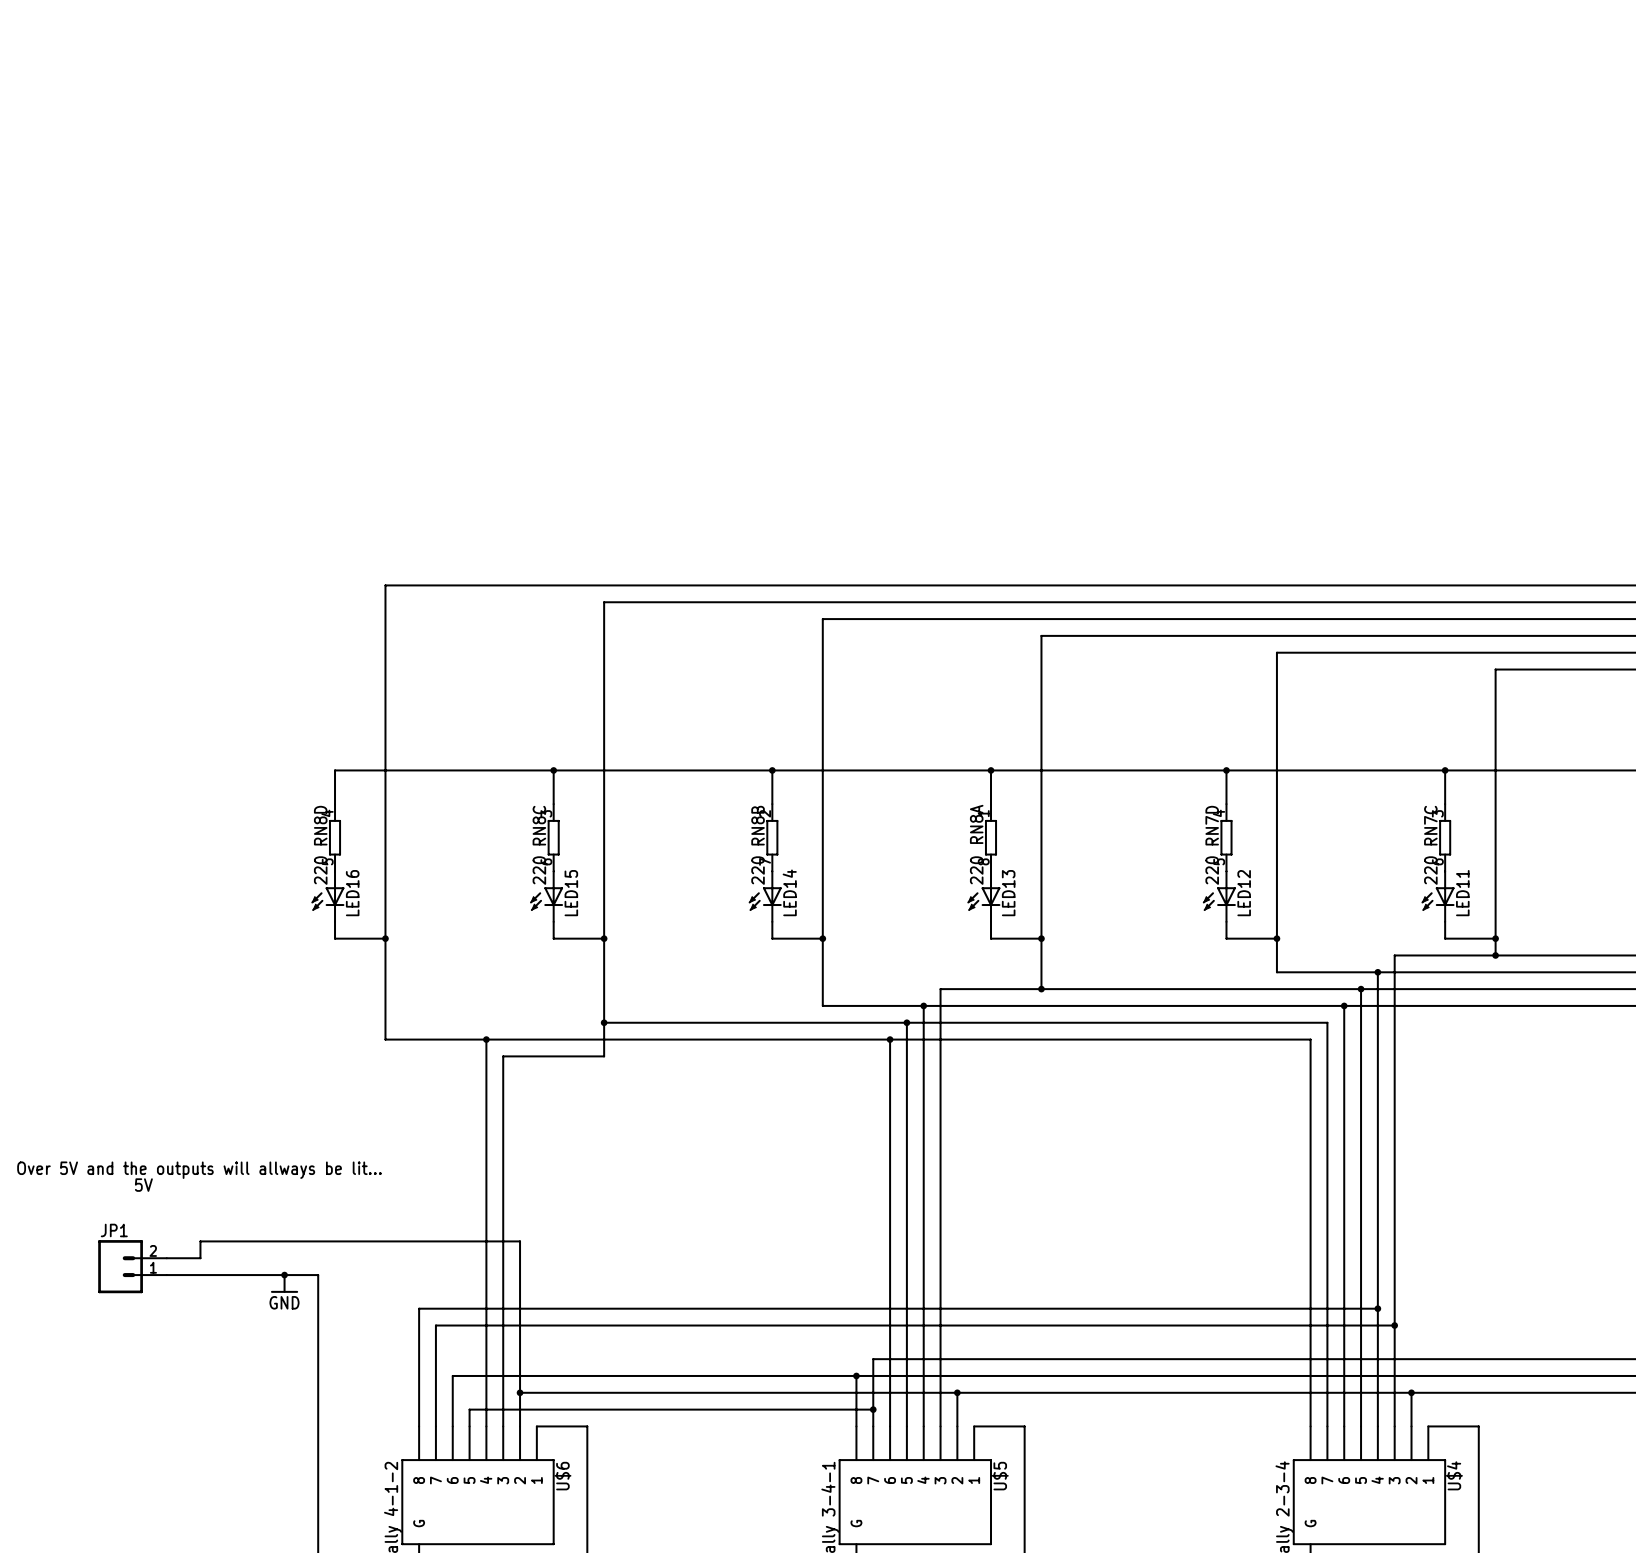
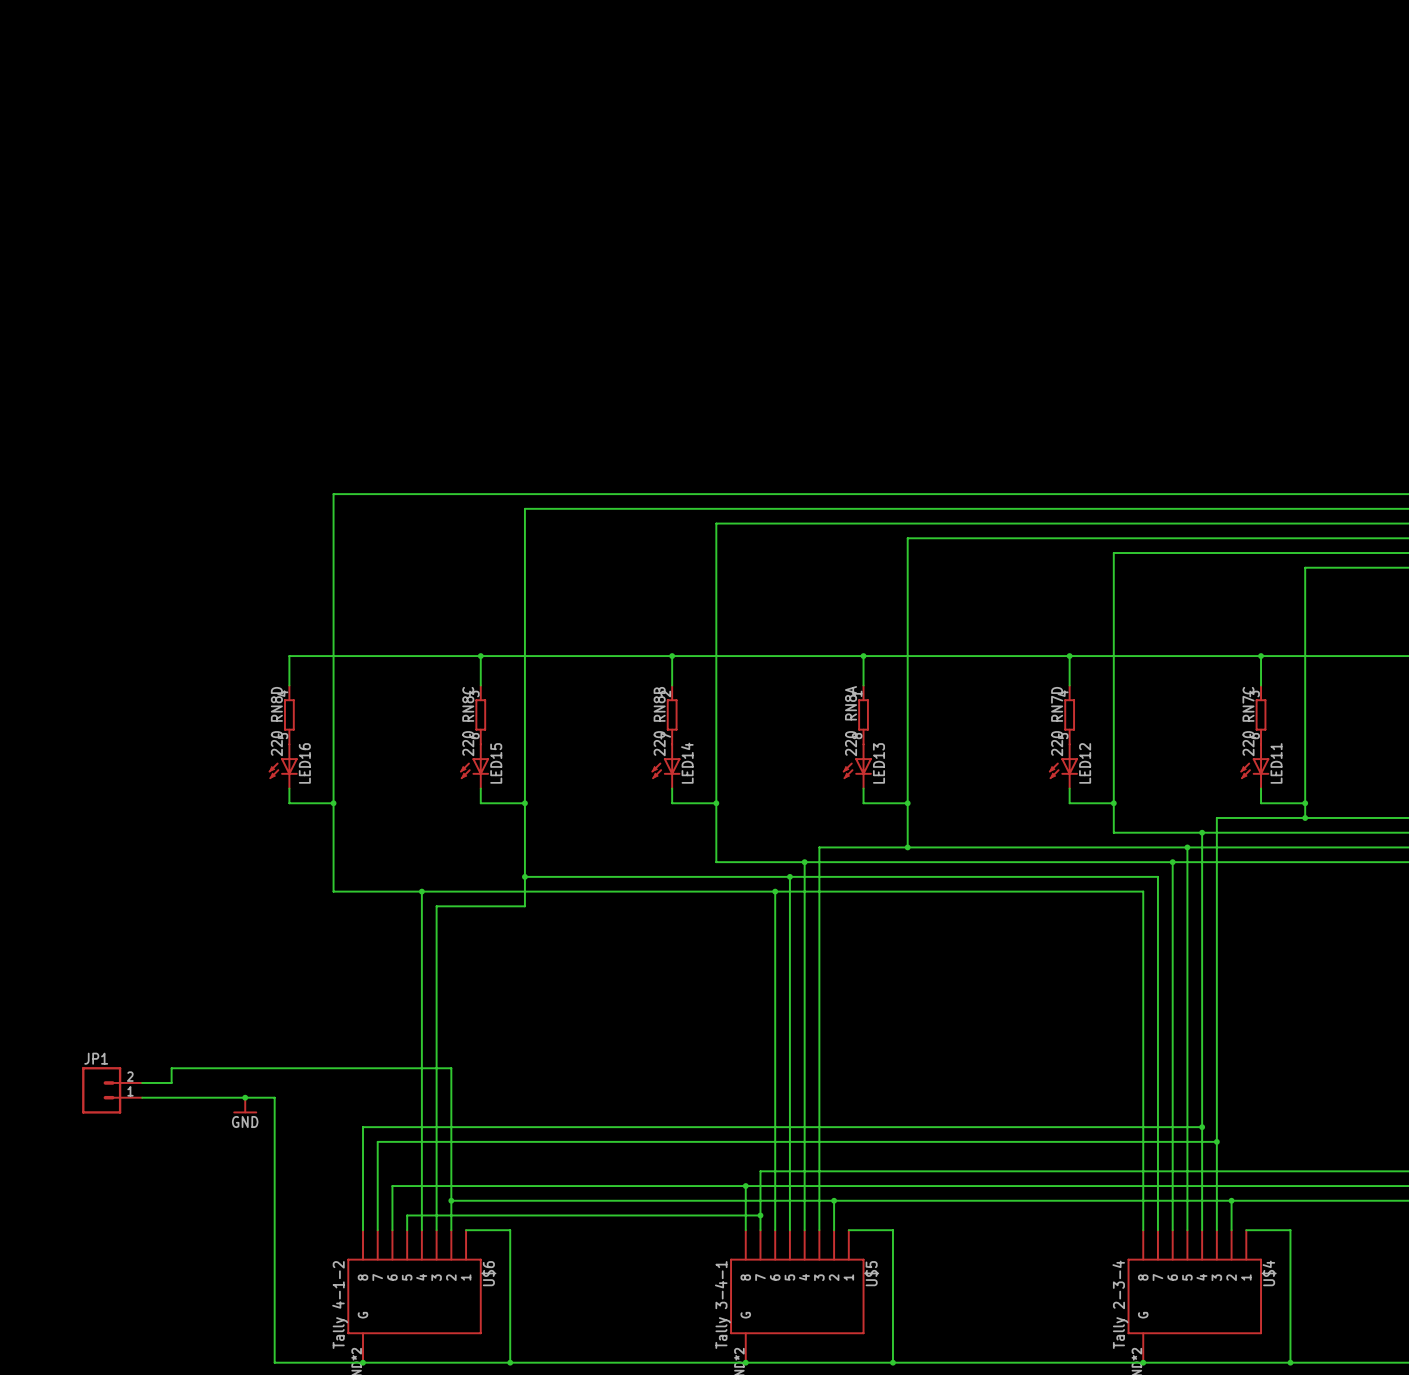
text: Over 5V and the outputs will allways be lit... (199, 1170) -> none
text: 5V (143, 1185) -> none

